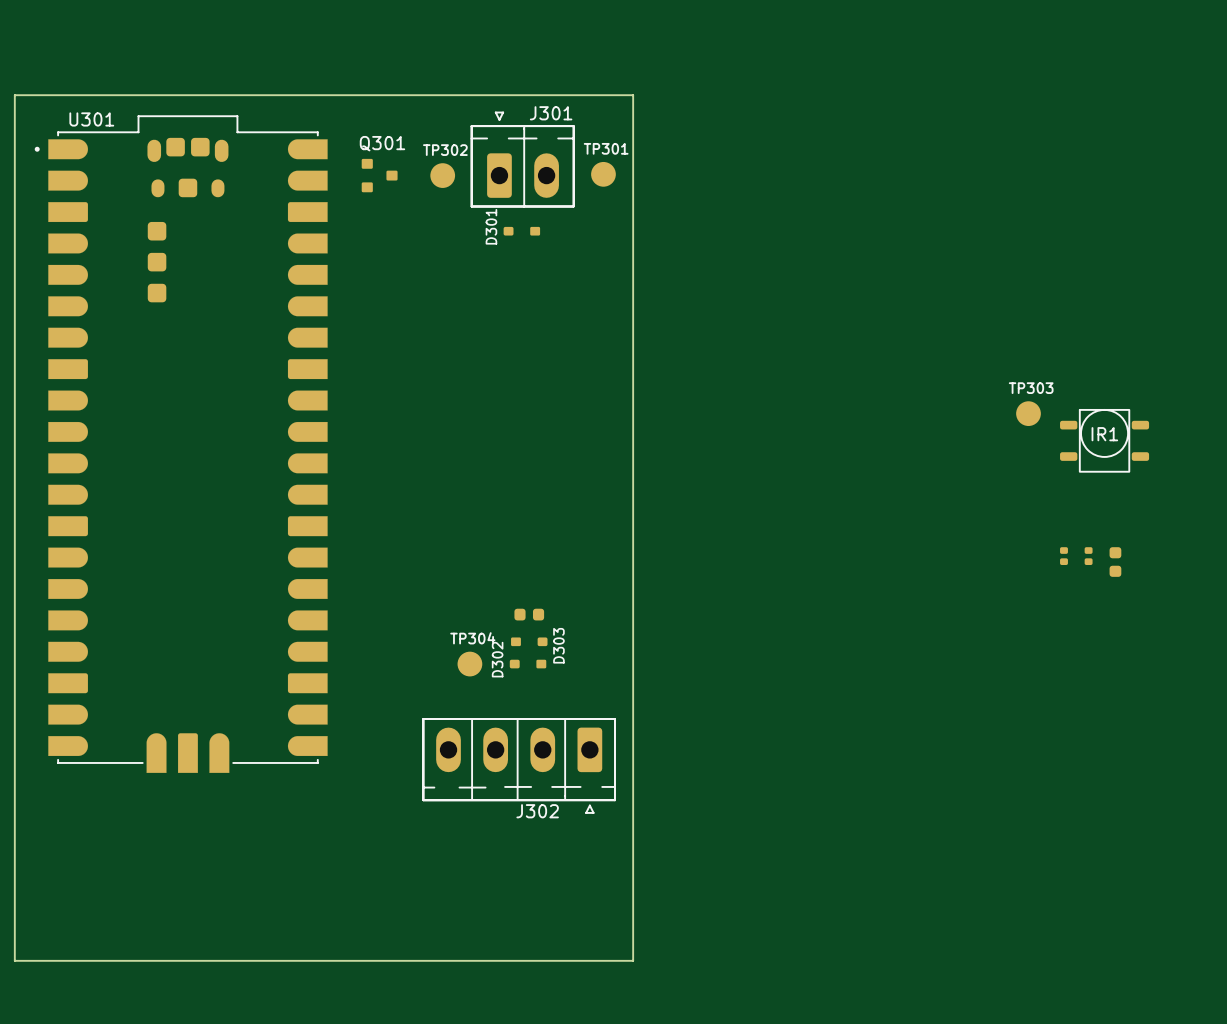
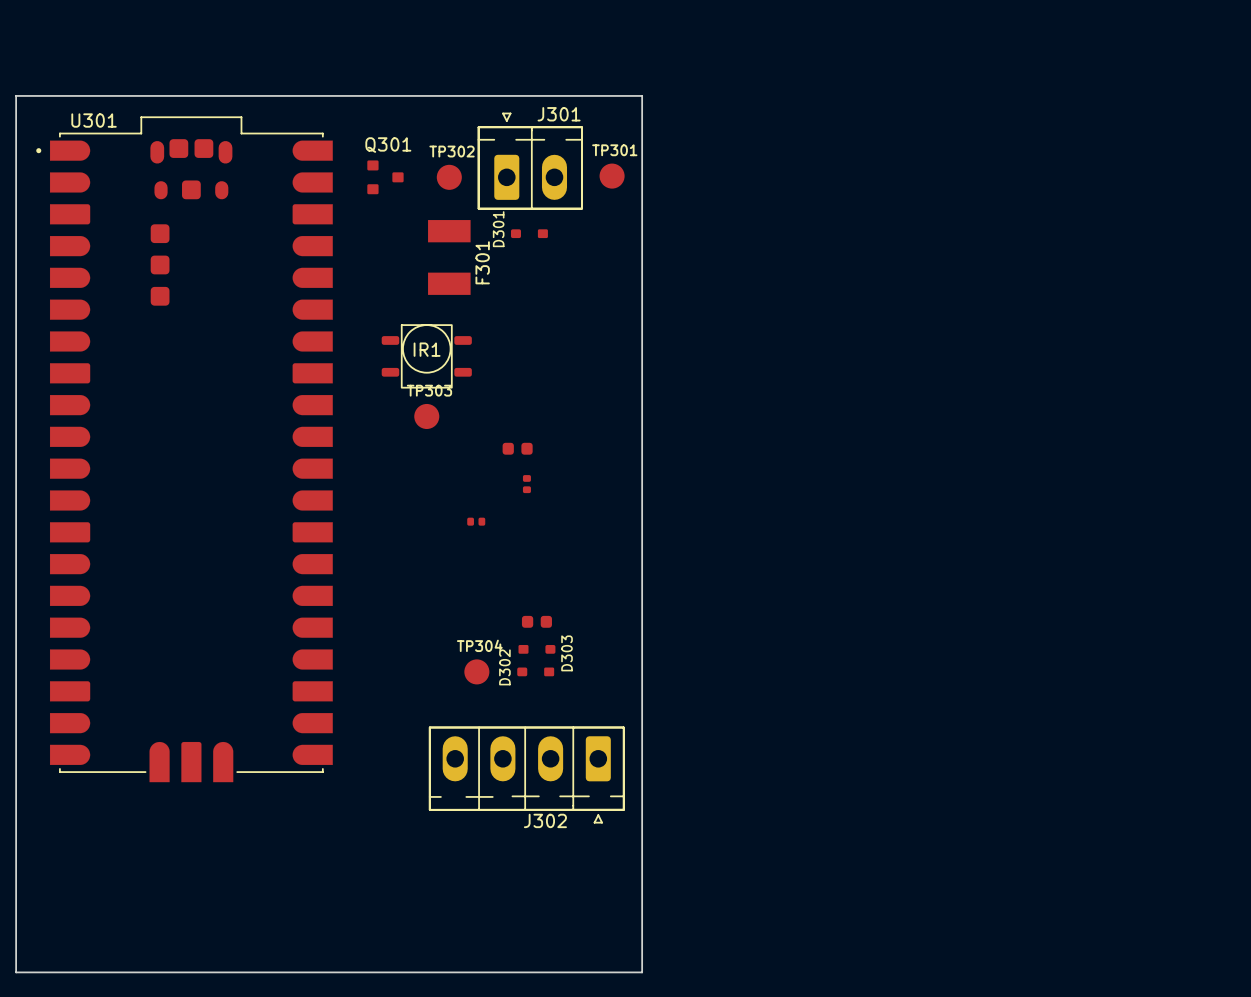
F301: none -> (449, 257)
TP303 position: (1028, 413) -> (426, 416)
IR1 position: (1104, 440) -> (426, 356)
part: none -> (517, 448)
part: none -> (526, 484)
part: none -> (476, 521)
part: (1063, 556) -> none
part: (1088, 556) -> none
part: (1115, 562) -> none

